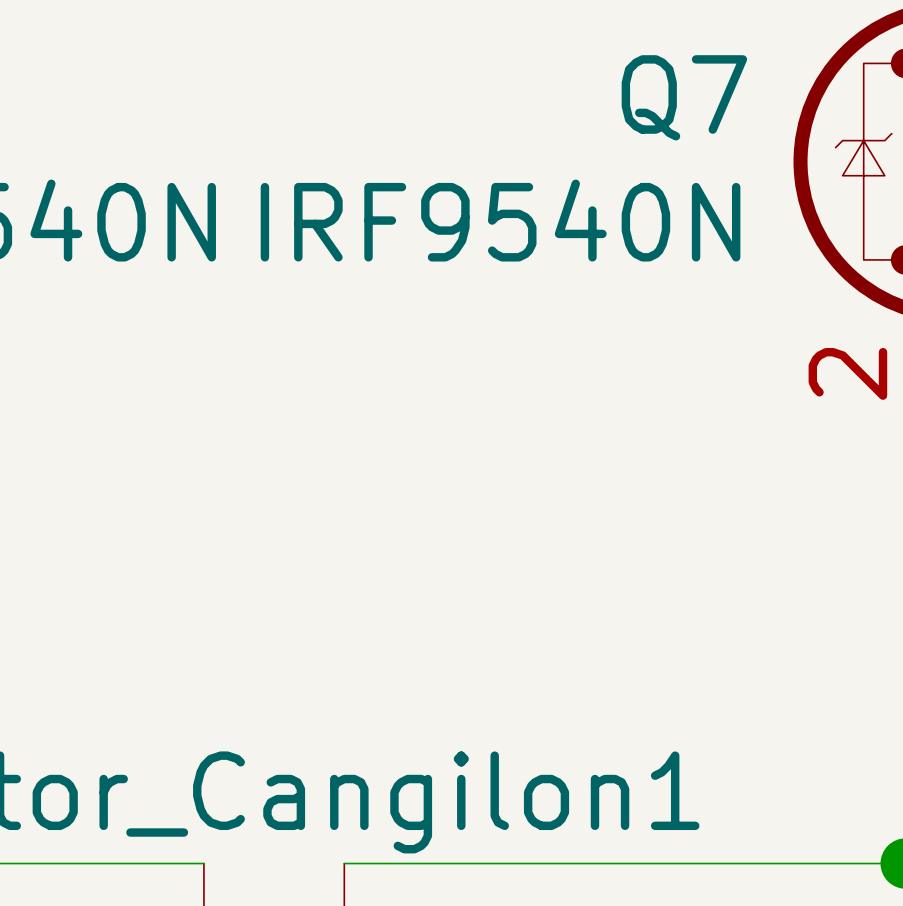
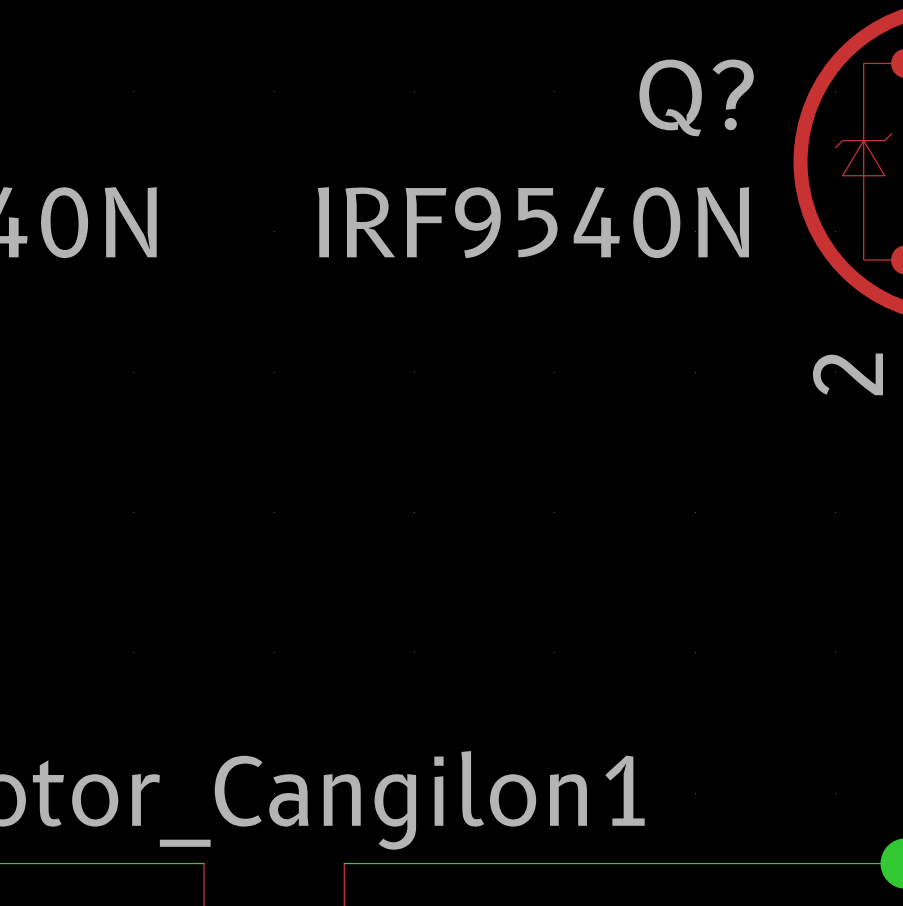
Q7 name: Q7 (684, 97) -> Q? (696, 97)

